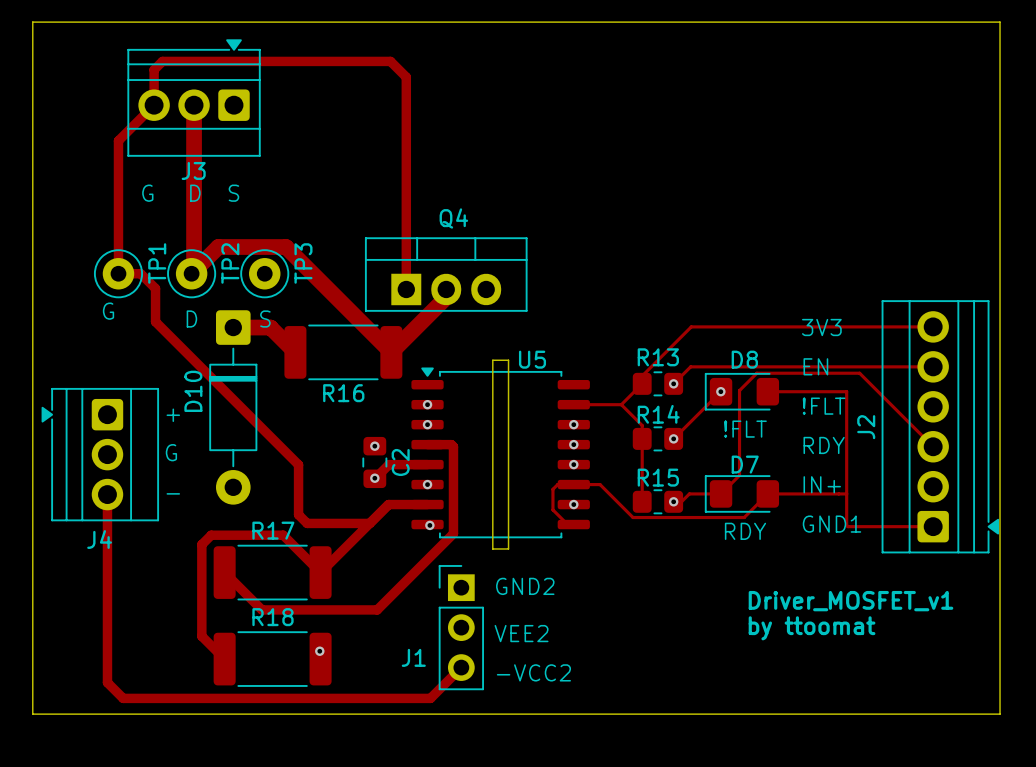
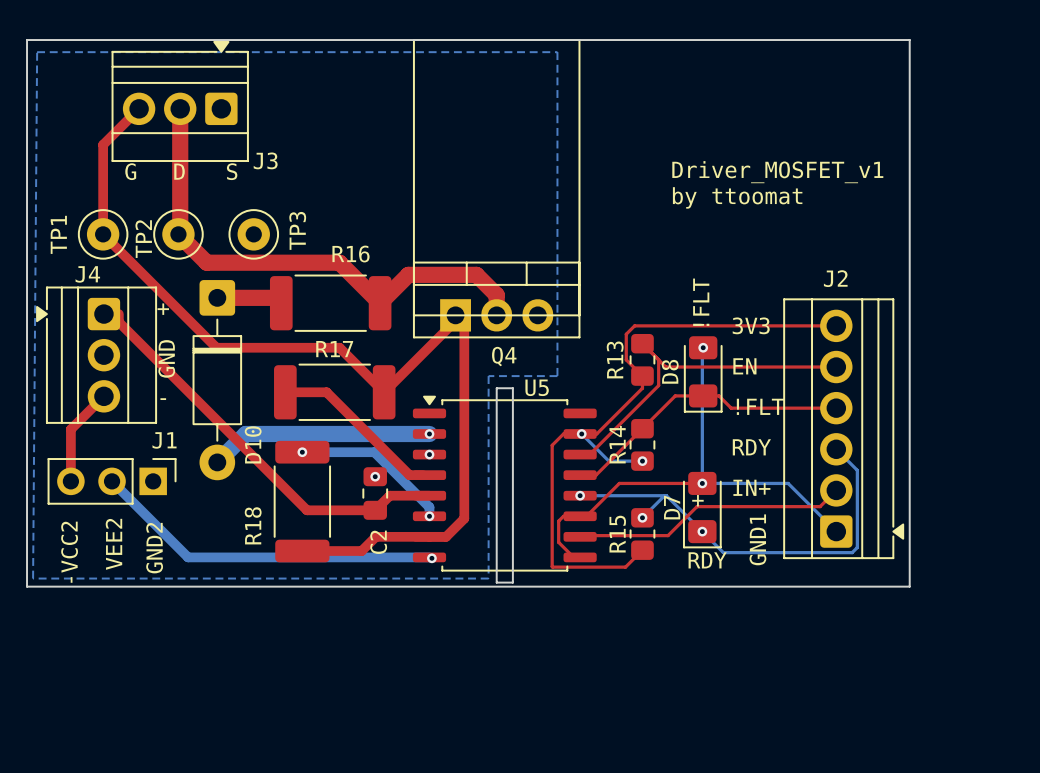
board edge: (36, 22) (32, 22) (32, 714) (1000, 714) (1000, 22) (893, 22) -> (27, 40) (27, 586) (909, 586) (909, 40)
line: none -> (413, 40) (579, 40) (579, 315) (413, 315) (413, 40)
bottom zone outline: none -> (37, 52) (557, 52) (557, 376) (488, 376) (488, 578) (33, 578) (37, 52)
top track: none -> (139, 108) (103, 144) (103, 234) (216, 347) (339, 347) (384, 392) (455, 320) (455, 315) (464, 324) (464, 518) (446, 536) (429, 536)
top track: none -> (180, 108) (180, 232) (178, 234) (206, 262) (339, 262) (380, 303) (408, 274) (476, 274) (496, 295) (496, 315)
J3 position: (194, 98) -> (180, 101)
top track: (194, 105) (194, 271) -> none
text: none -> Driver_MOSFET_v1 (777, 172)
J3 name position: J3 (193, 170) -> J3 (265, 160)
text: none -> by ttoomat (737, 197)
text position: G (147, 193) -> G (130, 171)
text position: D (195, 193) -> D (179, 171)
text position: S (233, 193) -> S (232, 171)
Q4 name position: Q4 (453, 218) -> Q4 (504, 356)
TP1 name position: TP1 (157, 263) -> TP1 (58, 234)
TP2 name position: TP2 (230, 263) -> TP2 (143, 239)
TP3 name position: TP3 (303, 263) -> TP3 (297, 230)
top track: none -> (217, 297) (275, 297) (281, 303)
TP1 position: (118, 273) -> (103, 234)
top track: (191, 273) (218, 247) (285, 247) (391, 352) (446, 297) -> none
TP2 position: (191, 273) -> (178, 234)
TP3 position: (264, 273) -> (253, 234)
Q4 position: (446, 274) -> (496, 299)
text: none -> !FLT (701, 302)
top track: none -> (103, 314) (118, 314) (118, 322) (307, 510) (375, 510)
top track: (406, 289) (406, 77) (390, 61) (162, 61) (154, 69) (154, 105) (118, 140) (118, 273) (140, 273) (155, 288) (155, 321) (298, 464) (298, 514) -> none
text: G (108, 311) -> none
top track: none -> (642, 343) (665, 367) (836, 367)
text: D (191, 319) -> none
text: S (265, 319) -> none
bottom track: none -> (703, 347) (702, 483) (788, 483) (836, 531)
via: none -> (703, 347)
text: none -> GND (166, 358)
top track: (933, 326) (691, 326) (642, 375) (642, 383) (621, 404) -> none
top track: (233, 327) (270, 327) (295, 352) -> none
text position: 3V3 (821, 327) -> 3V3 (751, 325)
top track: none -> (658, 359) (658, 385) (589, 454) (580, 454)
R16 position: (343, 352) -> (330, 303)
R13 name position: R13 (658, 357) -> R13 (615, 359)
text position: EN (815, 366) -> EN (744, 366)
top track: (933, 366) (690, 366) (673, 383) -> none
top track: none -> (103, 396) (70, 429) (70, 481)
text: none -> !FLT (760, 406)
top track: none -> (836, 408) (731, 408) (719, 395) (675, 395) (596, 475) (580, 475)
R13 rotation: 0° (657, 383) -> 90° clockwise (642, 359)
R13 position: (657, 383) -> (642, 359)
via: (673, 383) -> none
D10 name position: D10 (193, 391) -> D10 (253, 444)
top track: (720, 391) (673, 438) -> none
via: (720, 391) -> none
D8 rotation: 0° (741, 391) -> 90° counterclockwise (703, 374)
D8 position: (741, 391) -> (703, 374)
top track: (767, 391) (846, 391) (847, 526) (933, 526) -> none
R16 name position: R16 (343, 393) -> R16 (350, 254)
bottom track: none -> (429, 433) (245, 433) (217, 462)
top track: none -> (580, 433) (563, 433) (552, 445) (552, 566) (625, 567) (642, 550)
bottom track: none -> (581, 433) (608, 461) (642, 461)
via: none -> (581, 433)
top track: (589, 404) (621, 404) -> (596, 433) (642, 388) (642, 376) (626, 359) (626, 334) (634, 325) (836, 325)
top track: (621, 404) (642, 425) (642, 501) -> none
text: !FLT (824, 406) -> none
D10 position: (233, 407) -> (217, 380)
R14 name position: R14 (658, 414) -> R14 (617, 444)
text position: + (173, 415) -> + (163, 309)
bottom track: none -> (836, 449) (857, 470) (857, 547) (852, 552) (723, 552) (666, 495) (580, 495)
bottom track: none -> (302, 452) (374, 452) (429, 507) (429, 516)
via: (573, 424) -> none
J2 position: (940, 426) -> (843, 428)
J2 name rotation: 0° (866, 427) -> 90° clockwise (835, 278)
J2 name position: J2 (866, 427) -> J2 (835, 278)
text: !FLT (745, 429) -> RDY (751, 447)
via: none -> (642, 461)
R14 rotation: 0° (657, 438) -> 90° clockwise (642, 444)
R14 position: (657, 438) -> (642, 444)
via: (673, 438) -> none
top track: (427, 444) (451, 444) (453, 446) (453, 533) (377, 609) (261, 609) (224, 572) -> (429, 475) (409, 475) (326, 392) (285, 392)
via: (573, 444) -> none
text: RDY (824, 445) -> none
top track: (933, 446) (859, 373) (756, 373) (739, 390) (739, 475) (721, 493) (689, 493) (681, 501) (673, 501) -> none
bottom track: none -> (112, 481) (188, 557) (429, 557)
text: G (171, 452) -> none
via: none -> (702, 483)
J4 position: (100, 454) -> (96, 355)
top track: none -> (836, 490) (820, 506) (697, 506) (668, 535) (580, 536)
C2 name position: C2 (400, 462) -> C2 (378, 542)
bottom track: none -> (664, 495) (642, 517)
text: none -> + (697, 500)
R15 name position: R15 (658, 477) -> R15 (617, 534)
via position: (374, 478) -> (302, 452)
top track: (580, 484) (600, 484) (633, 517) (744, 517) (767, 493) (846, 493) -> (586, 516) (619, 483) (702, 483)
text position: IN+ (822, 484) -> IN+ (751, 487)
via: none -> (642, 517)
text position: - (173, 493) -> - (163, 399)
D7 rotation: 0° (741, 493) -> 90° counterclockwise (702, 510)
D7 position: (741, 493) -> (702, 510)
top track: (107, 494) (107, 682) (123, 698) (430, 698) (461, 667) -> none
R15 rotation: 0° (657, 501) -> 90° clockwise (642, 534)
via position: (673, 501) -> (702, 531)
top track: (388, 504) (320, 572) (283, 535) (211, 535) (201, 544) (201, 636) (224, 659) -> (389, 536) (375, 536) (361, 551) (302, 551)
via: (573, 504) -> none
text: none -> -VCC2 (69, 552)
top track: (307, 523) (369, 523) -> none
text rotation: 0° (831, 524) -> 90° counterclockwise (757, 539)
text position: GND1 (831, 524) -> GND1 (757, 539)
text position: RDY (745, 531) -> RDY (707, 560)
J4 name position: J4 (99, 539) -> J4 (87, 274)
R17 position: (272, 572) -> (334, 392)
text rotation: 0° (525, 586) -> 90° counterclockwise (154, 548)
text position: GND2 (525, 586) -> GND2 (154, 548)
text: Driver_MOSFET_v1 (850, 601) -> none
R18 name position: R18 (272, 617) -> R18 (253, 525)
J1 rotation: 0° (461, 627) -> 90° clockwise (112, 481)
J1 position: (461, 627) -> (112, 481)
text: by ttoomat (812, 628) -> none
text rotation: 0° (521, 633) -> 90° counterclockwise (113, 544)
text position: VEE2 (521, 633) -> VEE2 (113, 544)
via: (319, 651) -> none
J1 name position: J1 (413, 657) -> J1 (164, 440)
R18 rotation: 0° (272, 659) -> 90° clockwise (302, 501)
R18 position: (272, 659) -> (302, 501)
text: -VCC2 (533, 672) -> none

